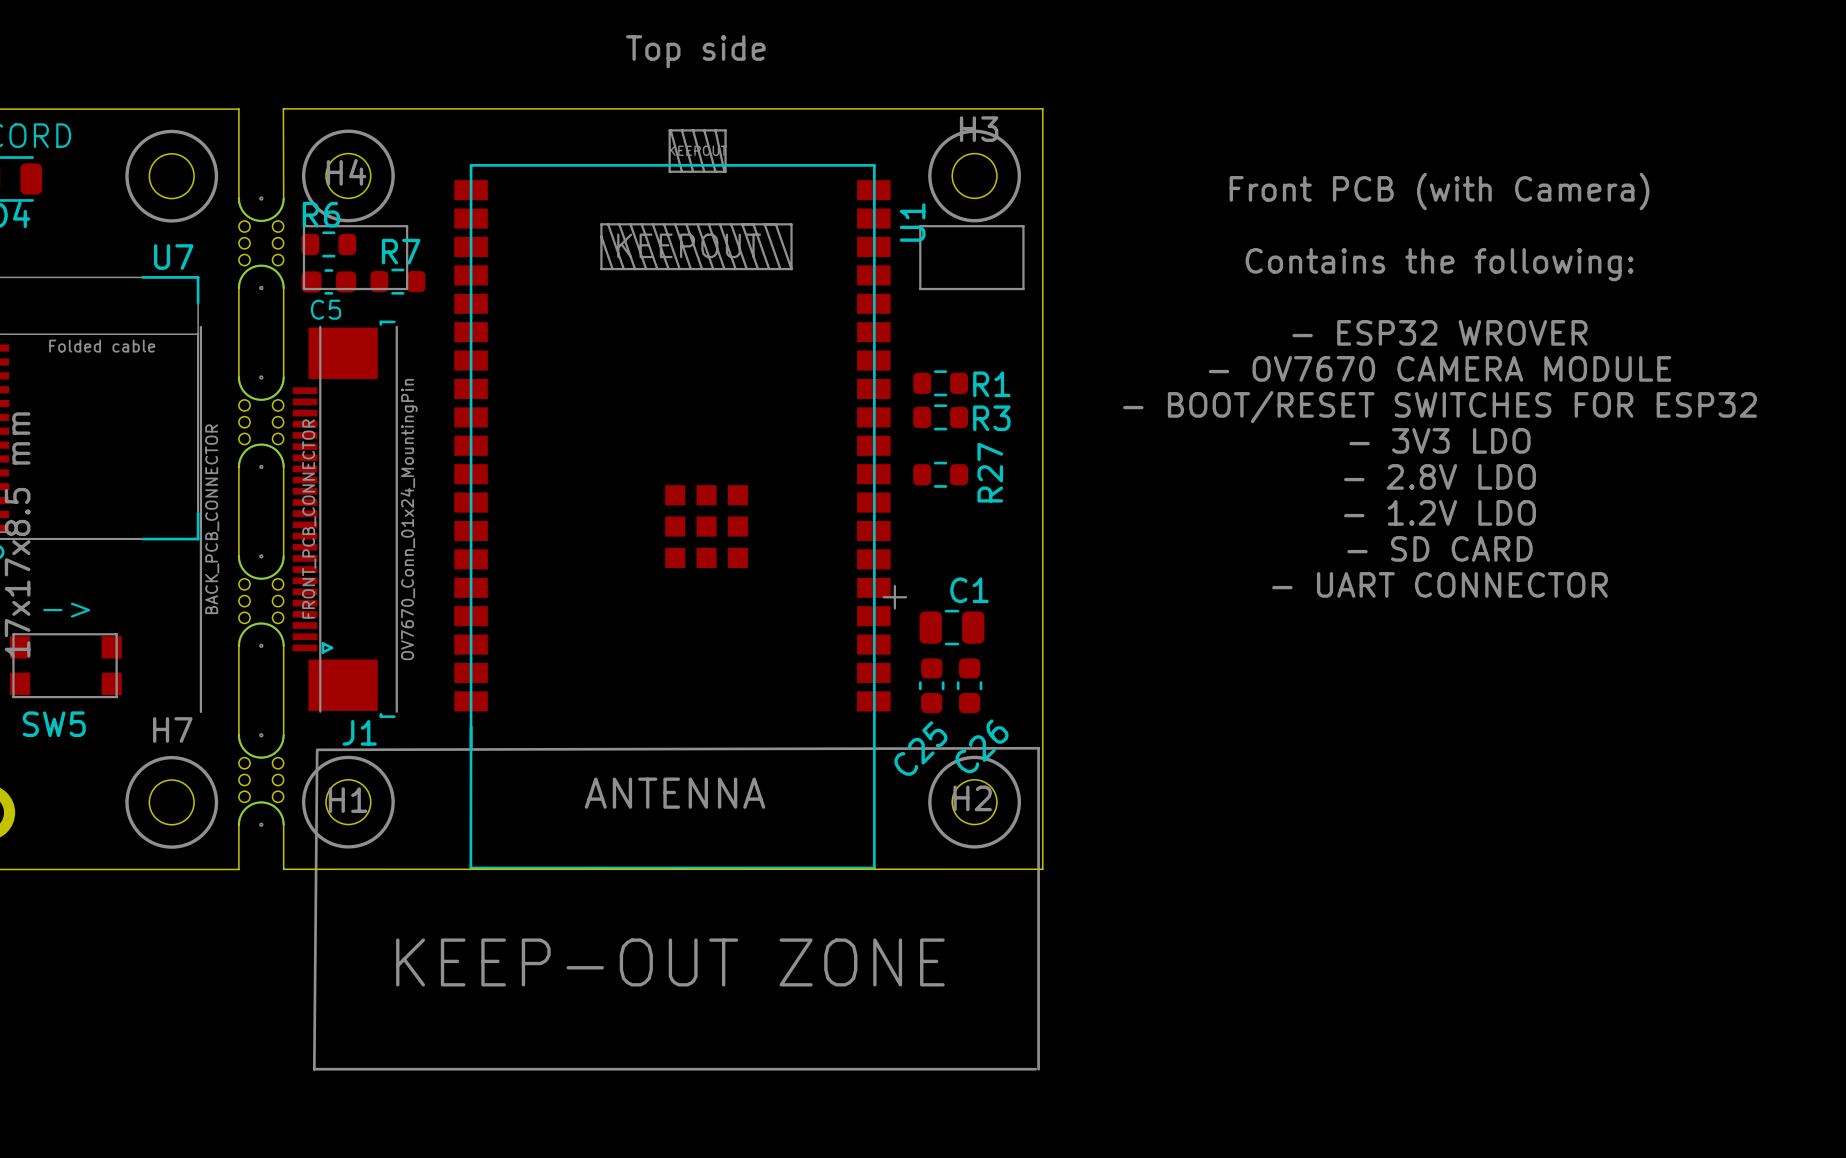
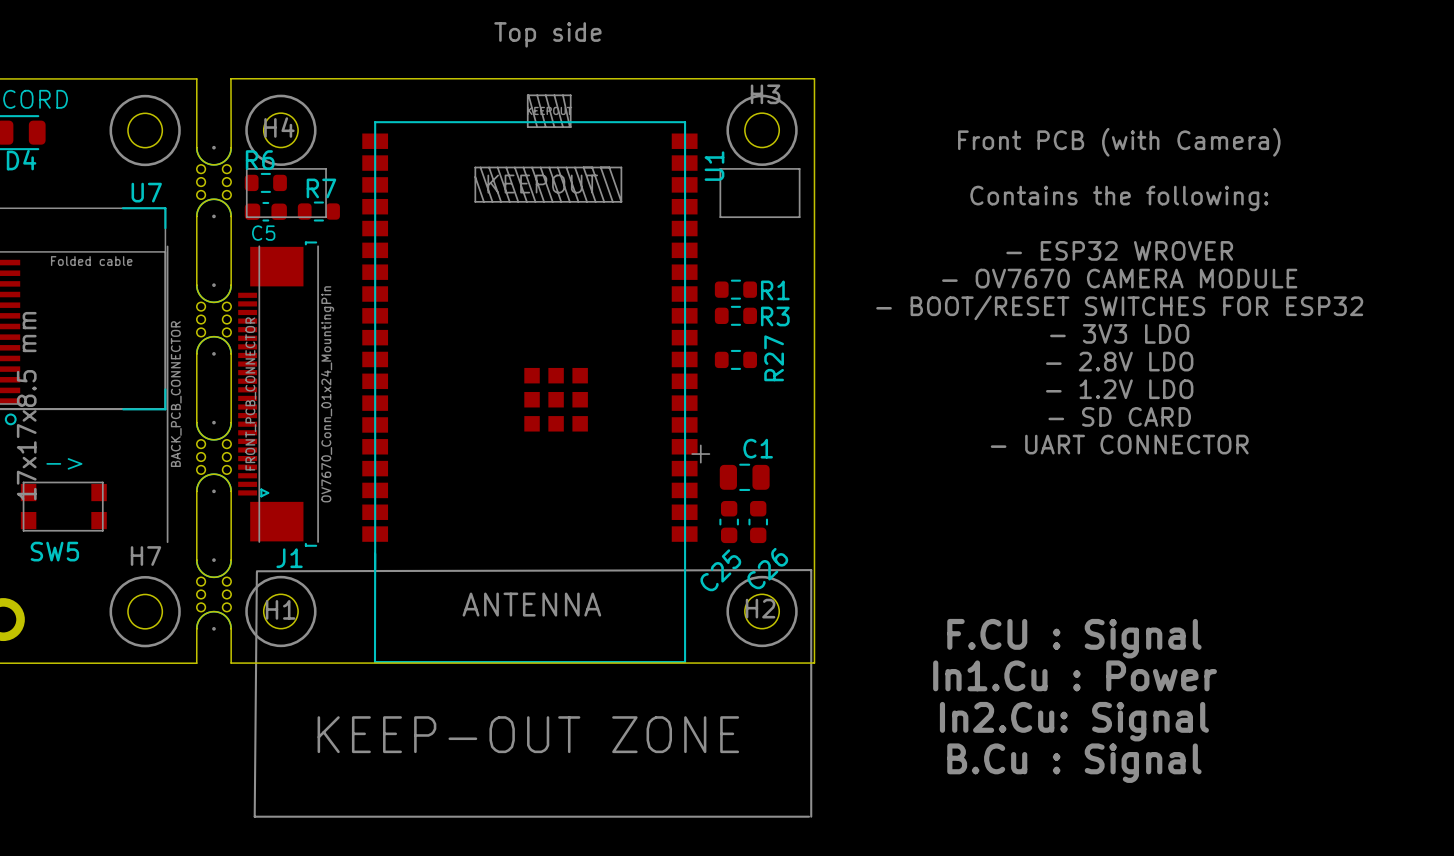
text: none -> F.CU : Signal (1074, 638)
text: none -> In1.Cu : Power (1075, 675)
text: none -> In2.Cu: Signal (1074, 721)
text: none -> B.Cu : Signal (1074, 763)

